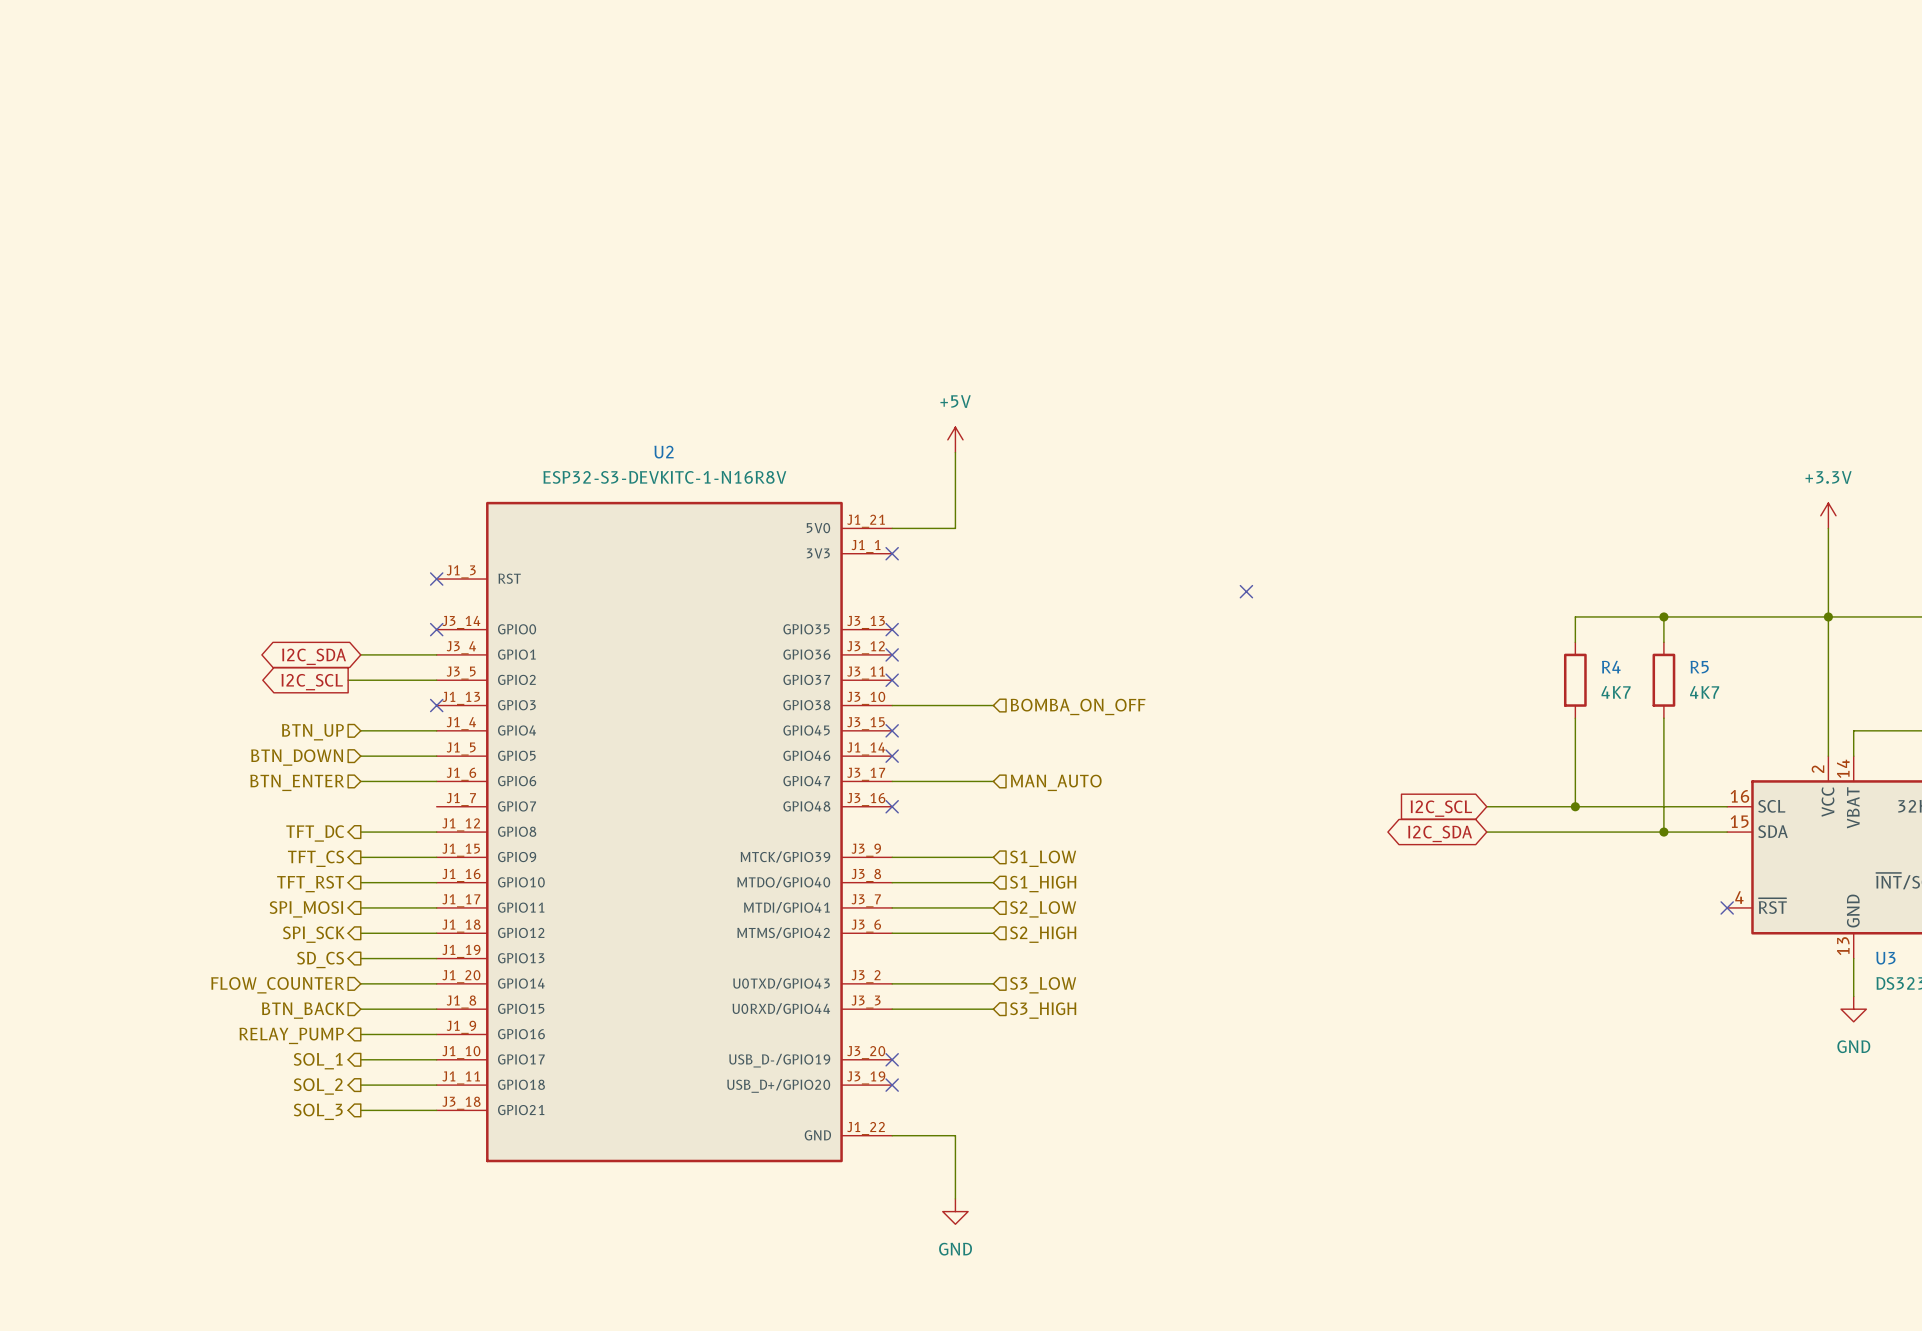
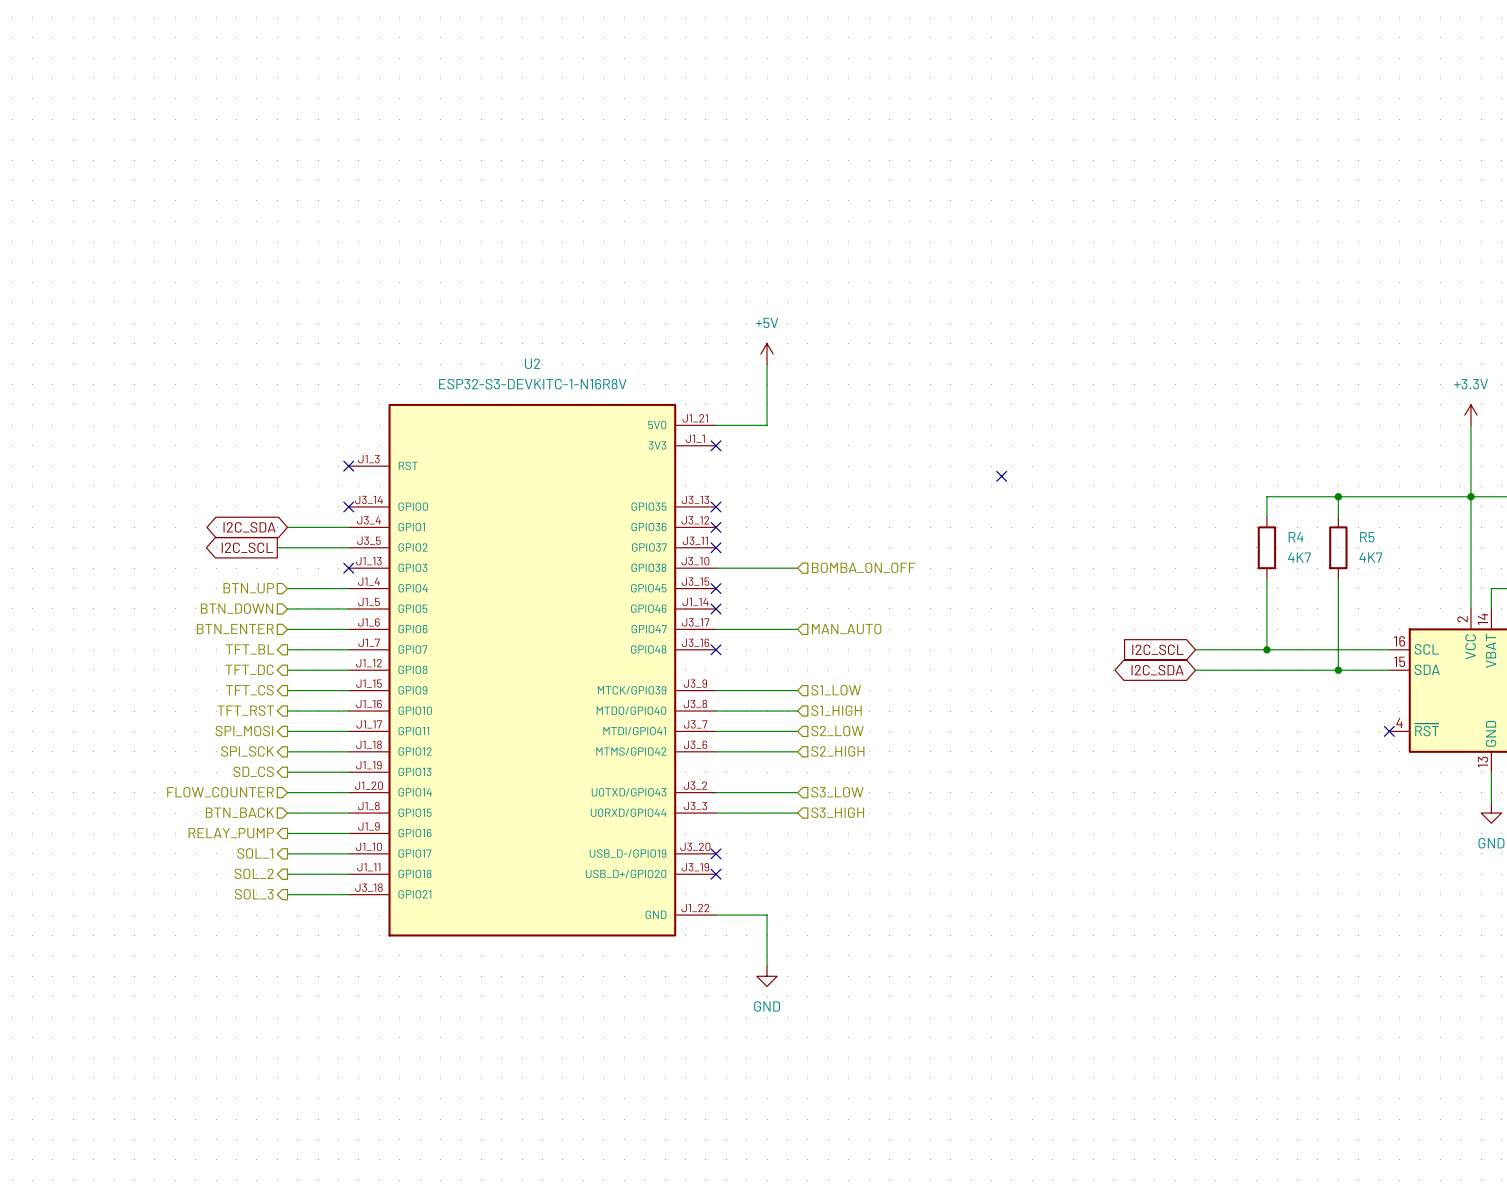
wire: none -> (287, 649) (348, 649)
hierarchical label: none -> TFT_BL (249, 649)

